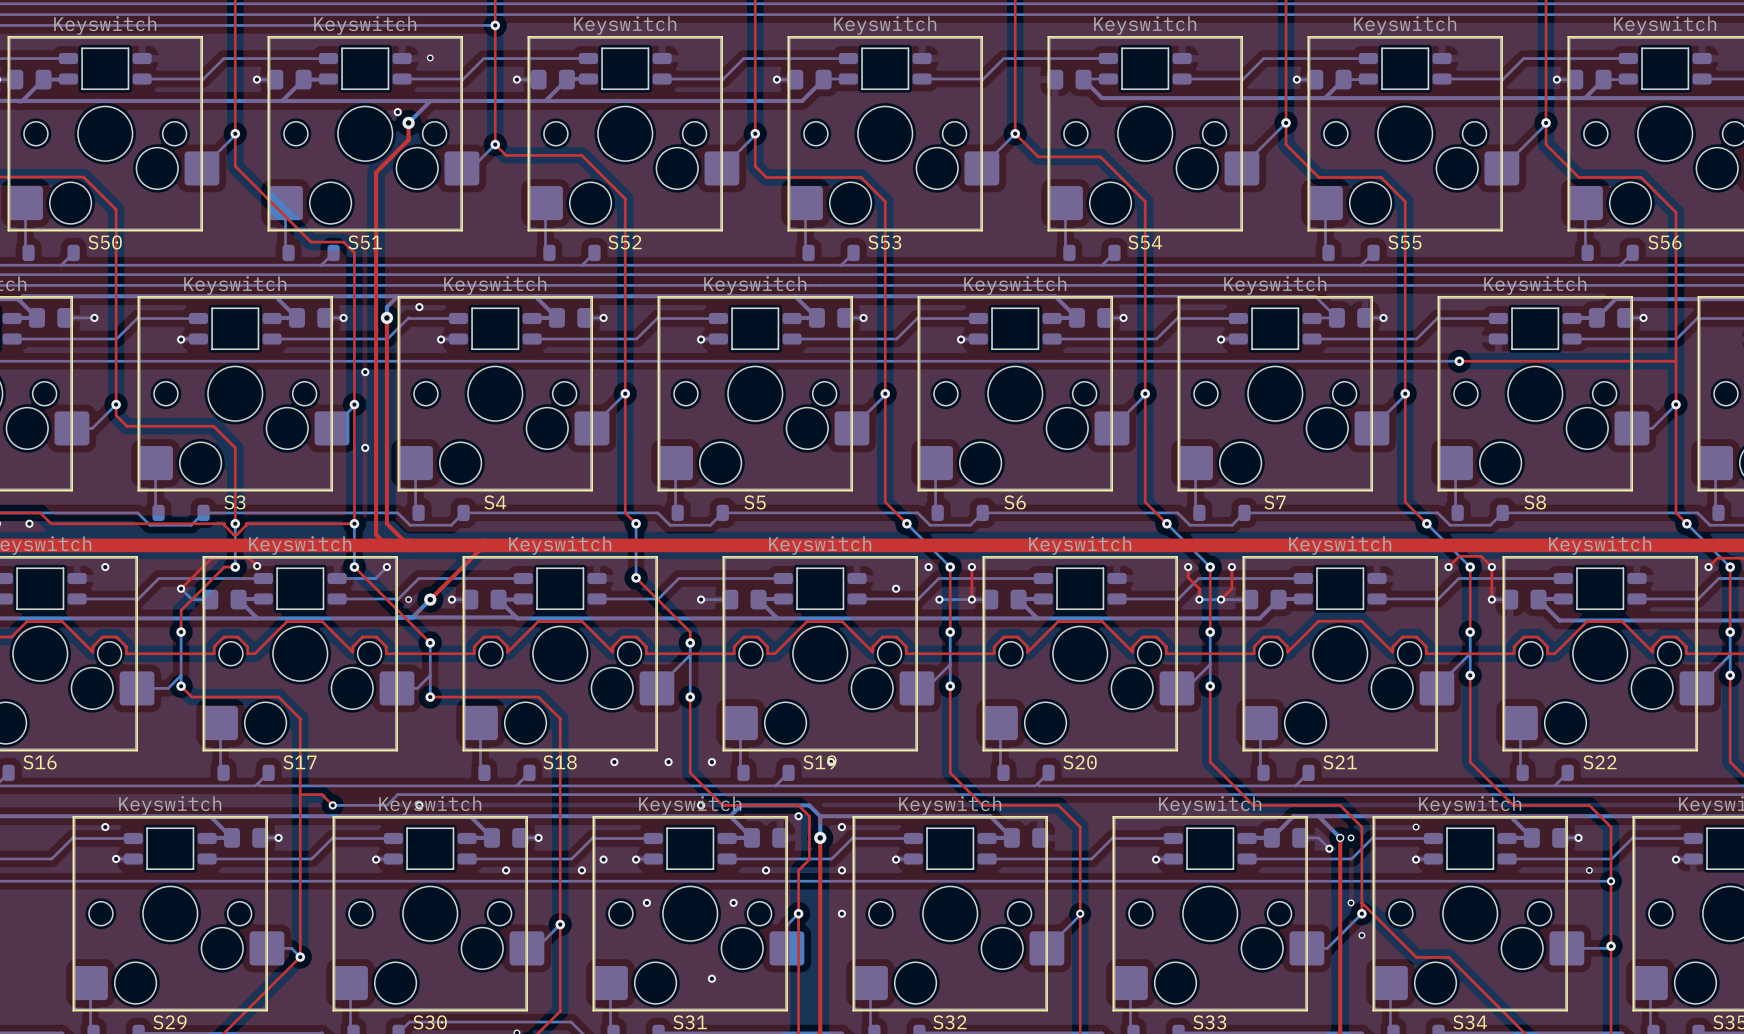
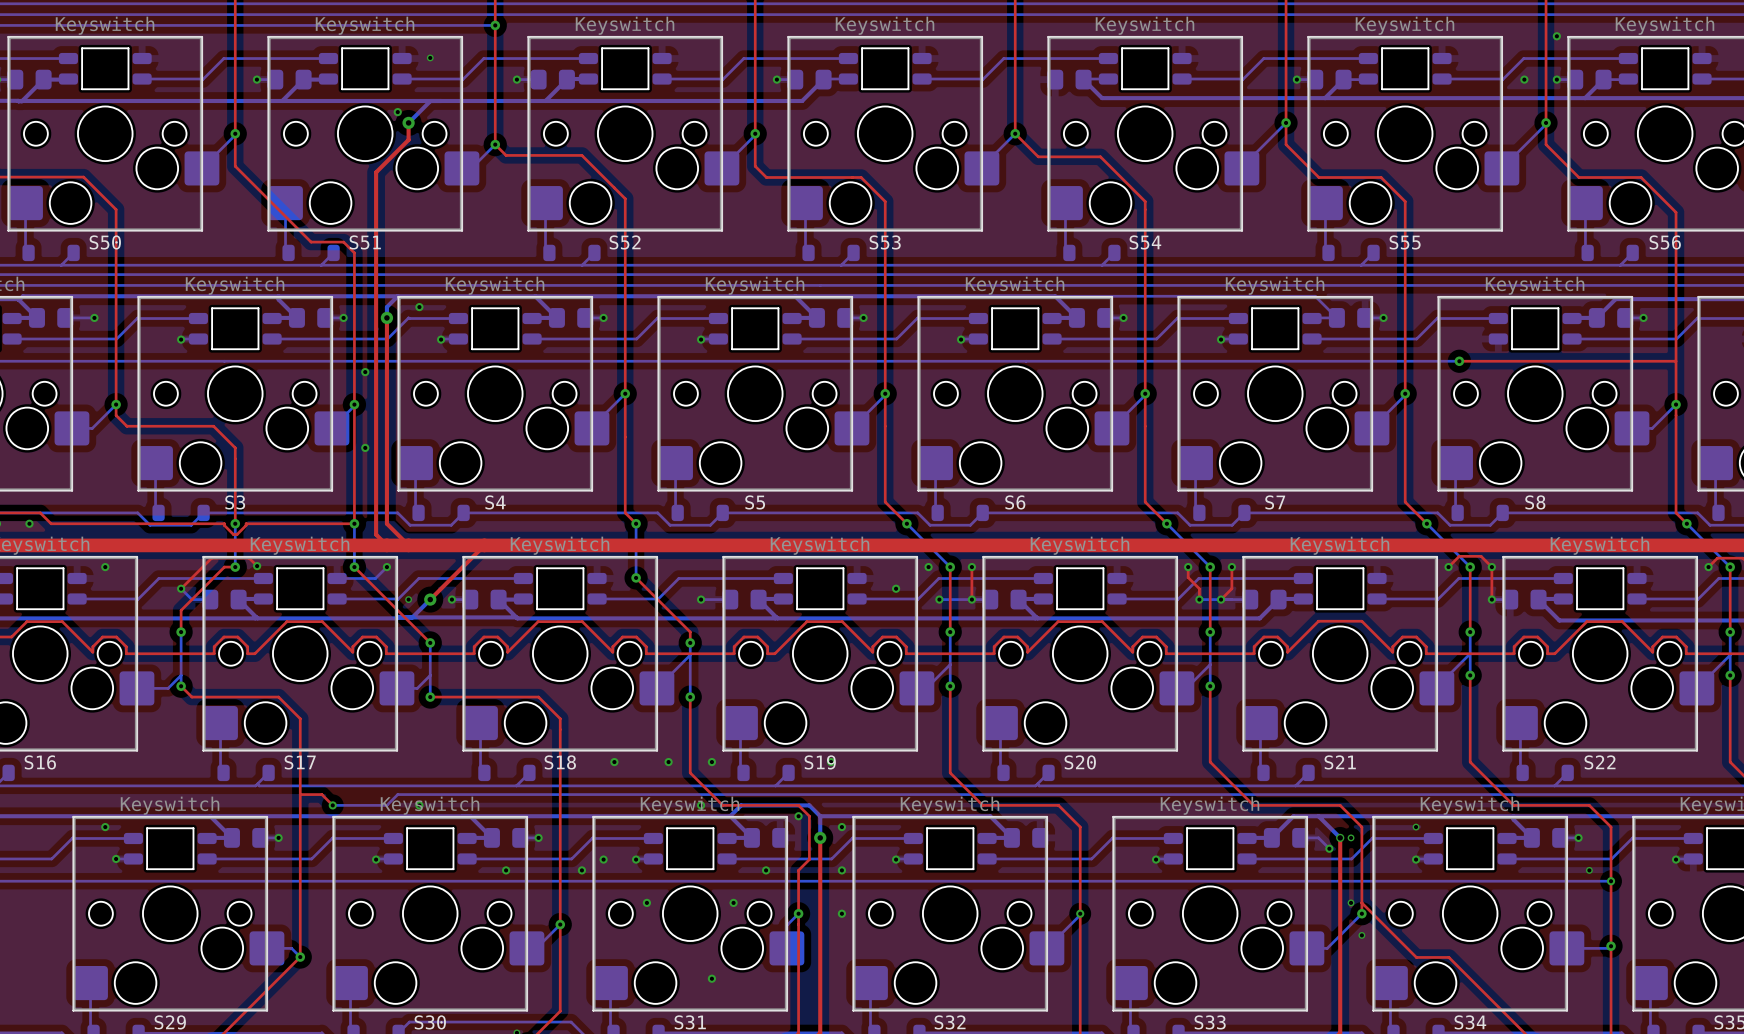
via: none -> (1556, 36)
via: none -> (1524, 79)

